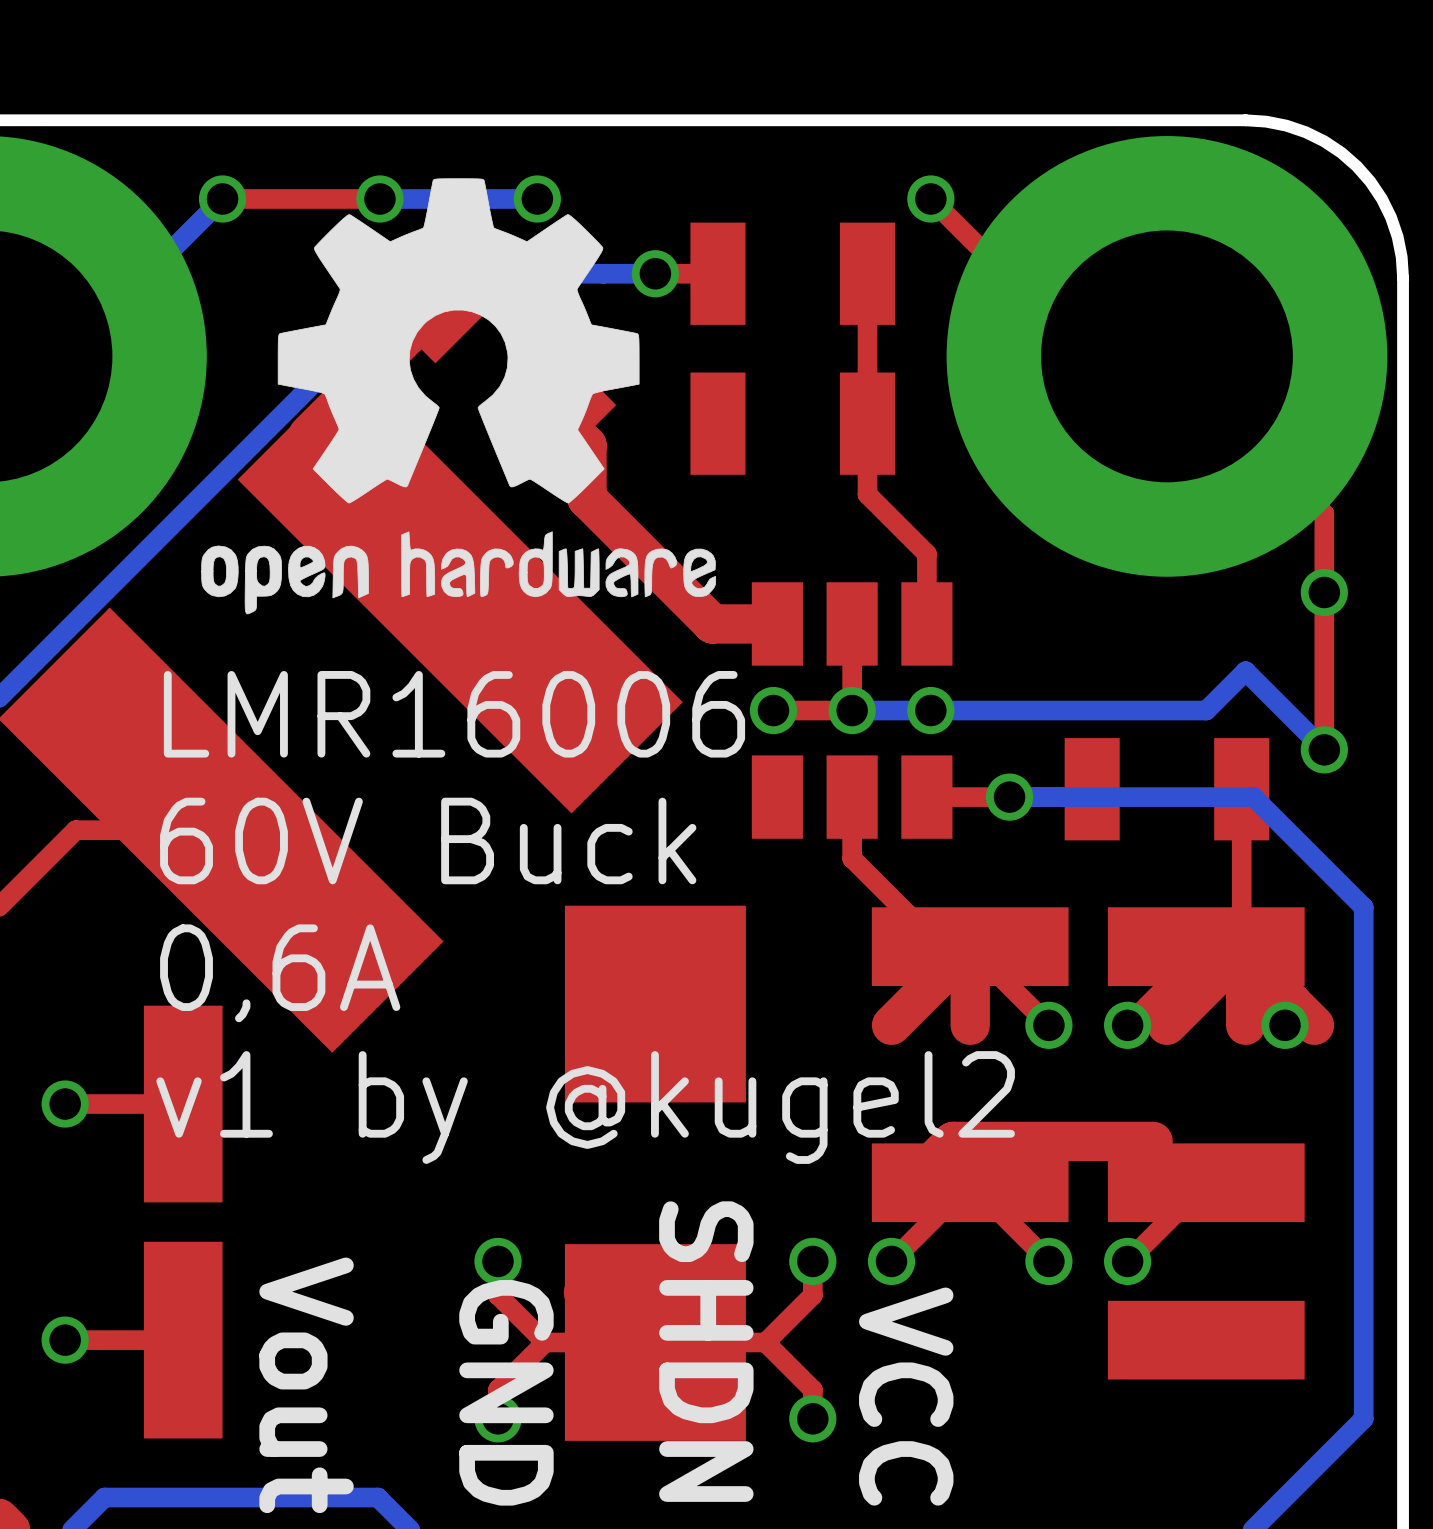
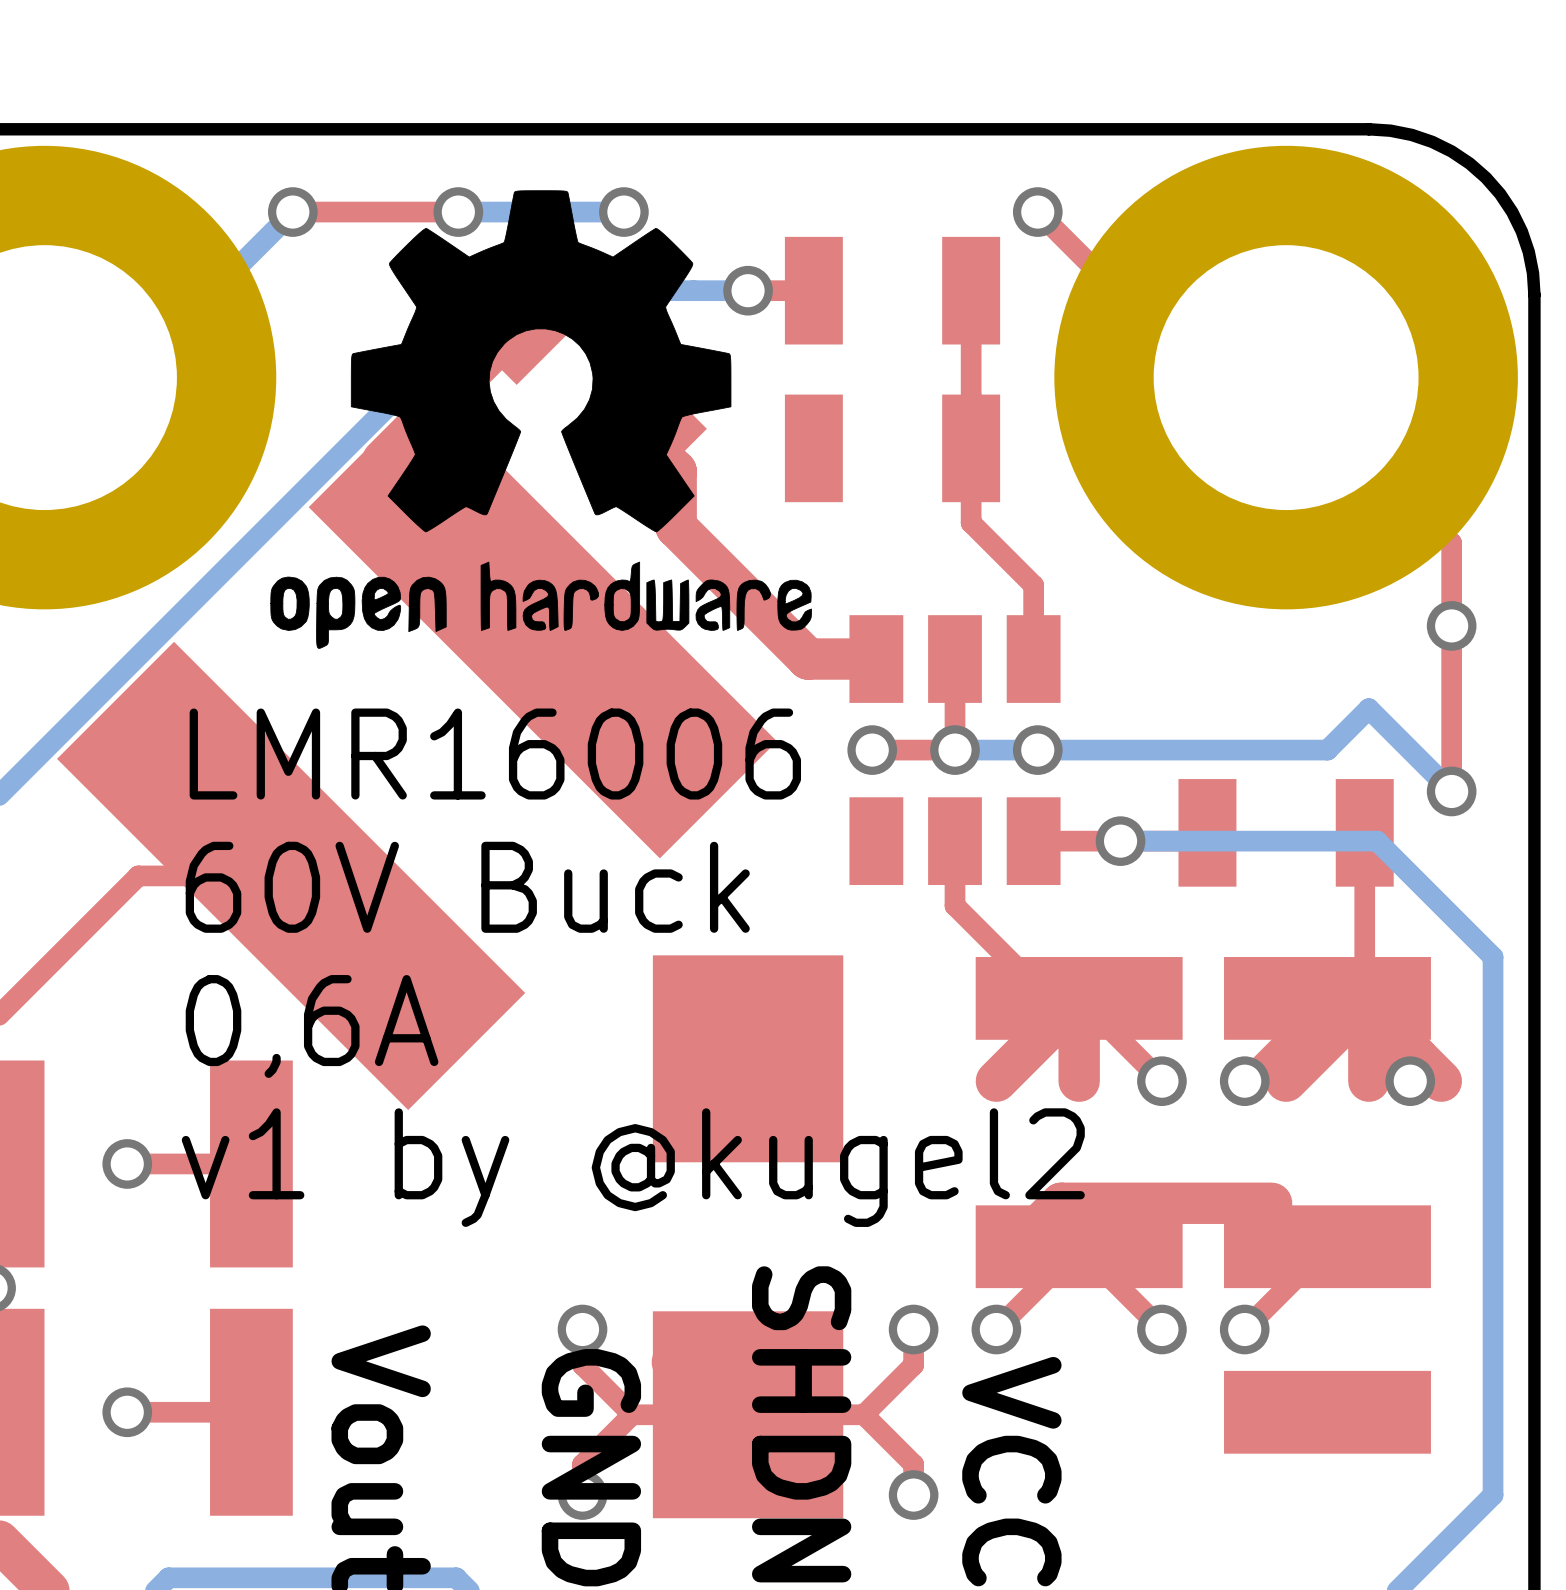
text position: LMR16006 (454, 714) -> LMR16006 (495, 754)
text position: 60V Buck (428, 840) -> 60V Buck (467, 887)
text position: 0,6A (280, 973) -> 0,6A (312, 1026)
text position: v1 by @kugel2 (585, 1107) -> v1 by @kugel2 (633, 1167)

